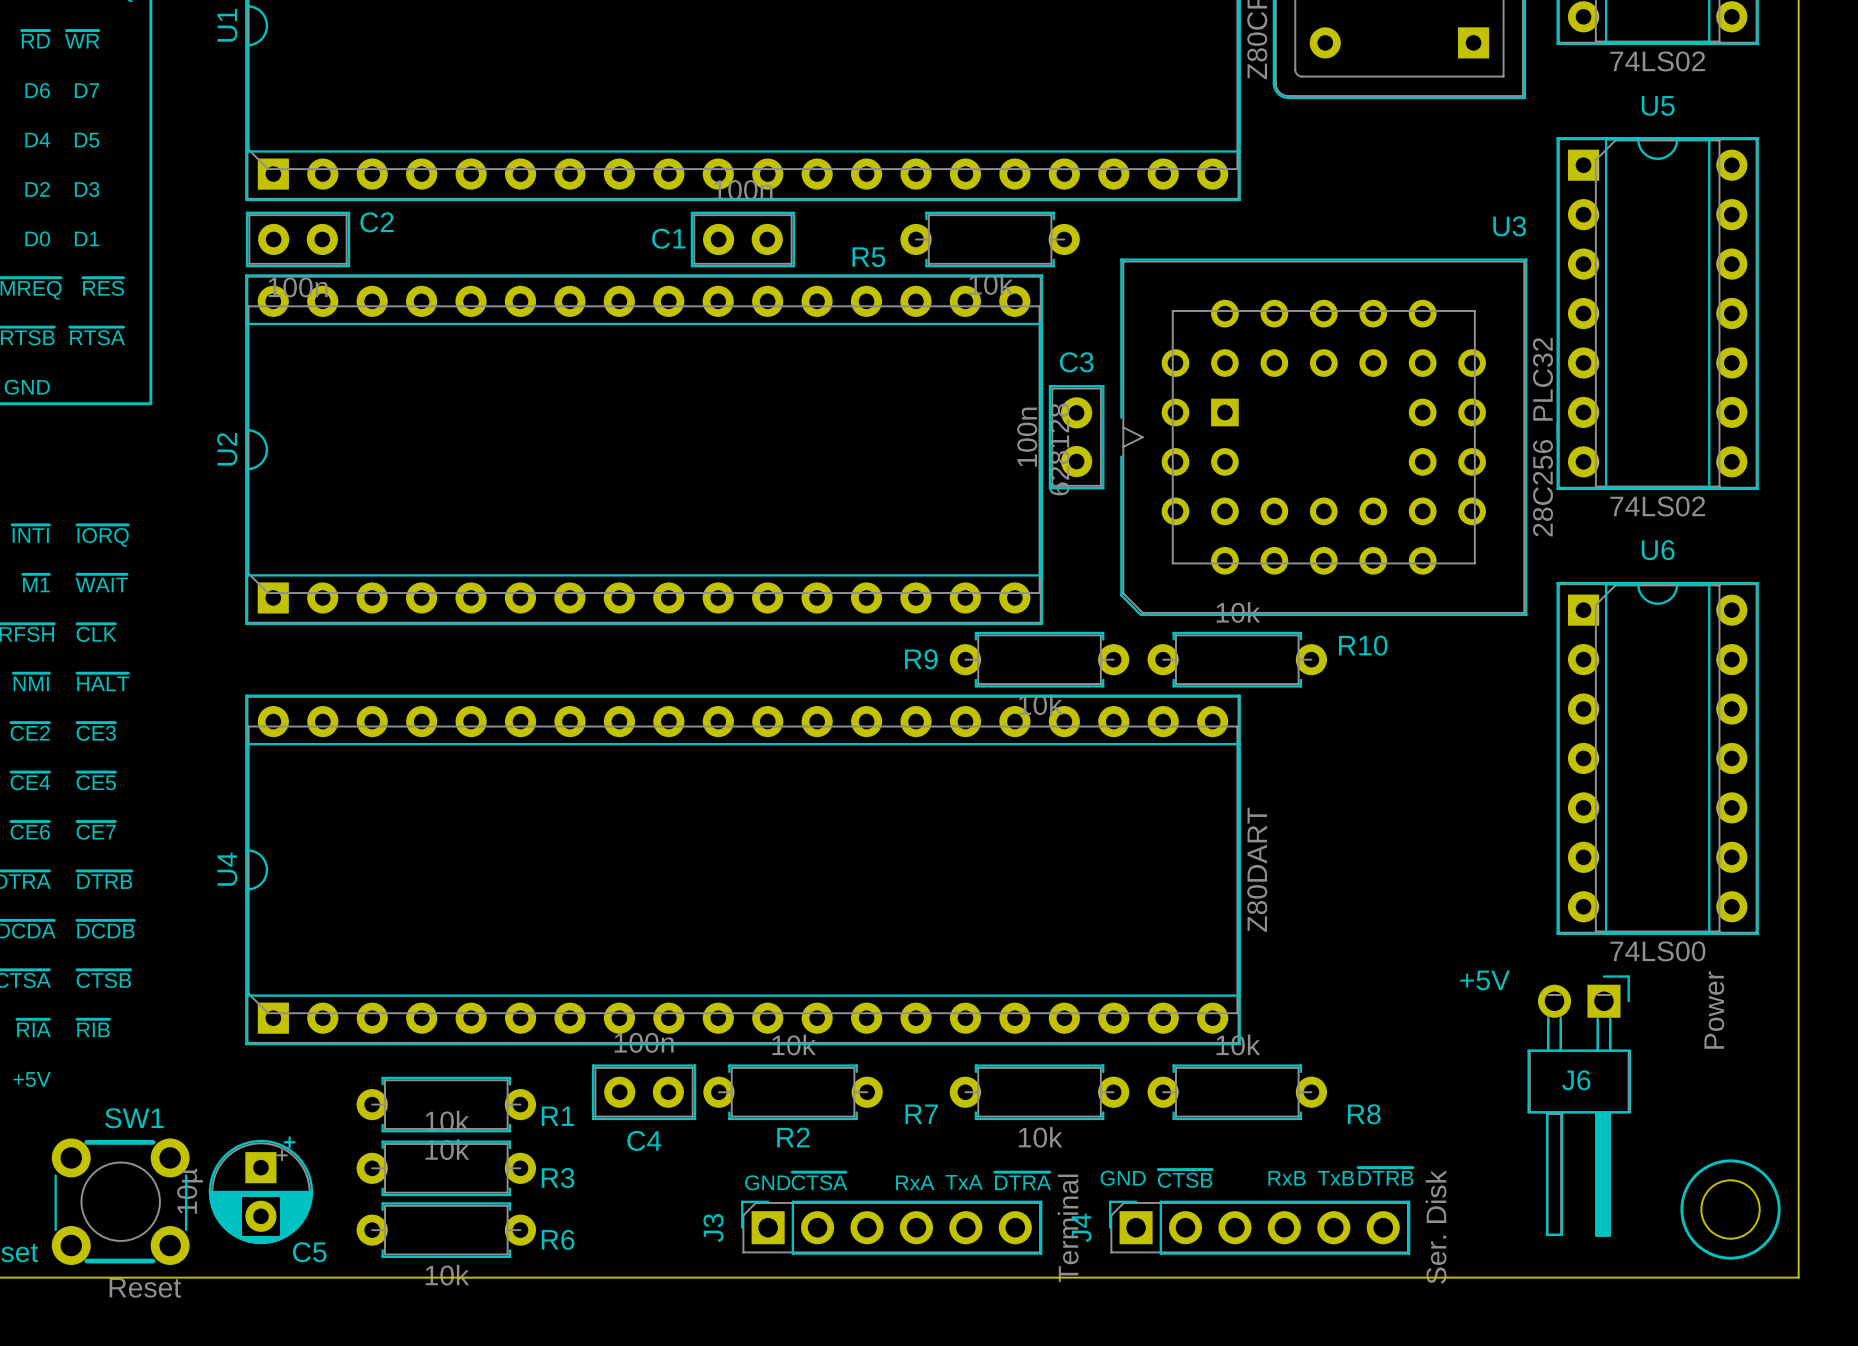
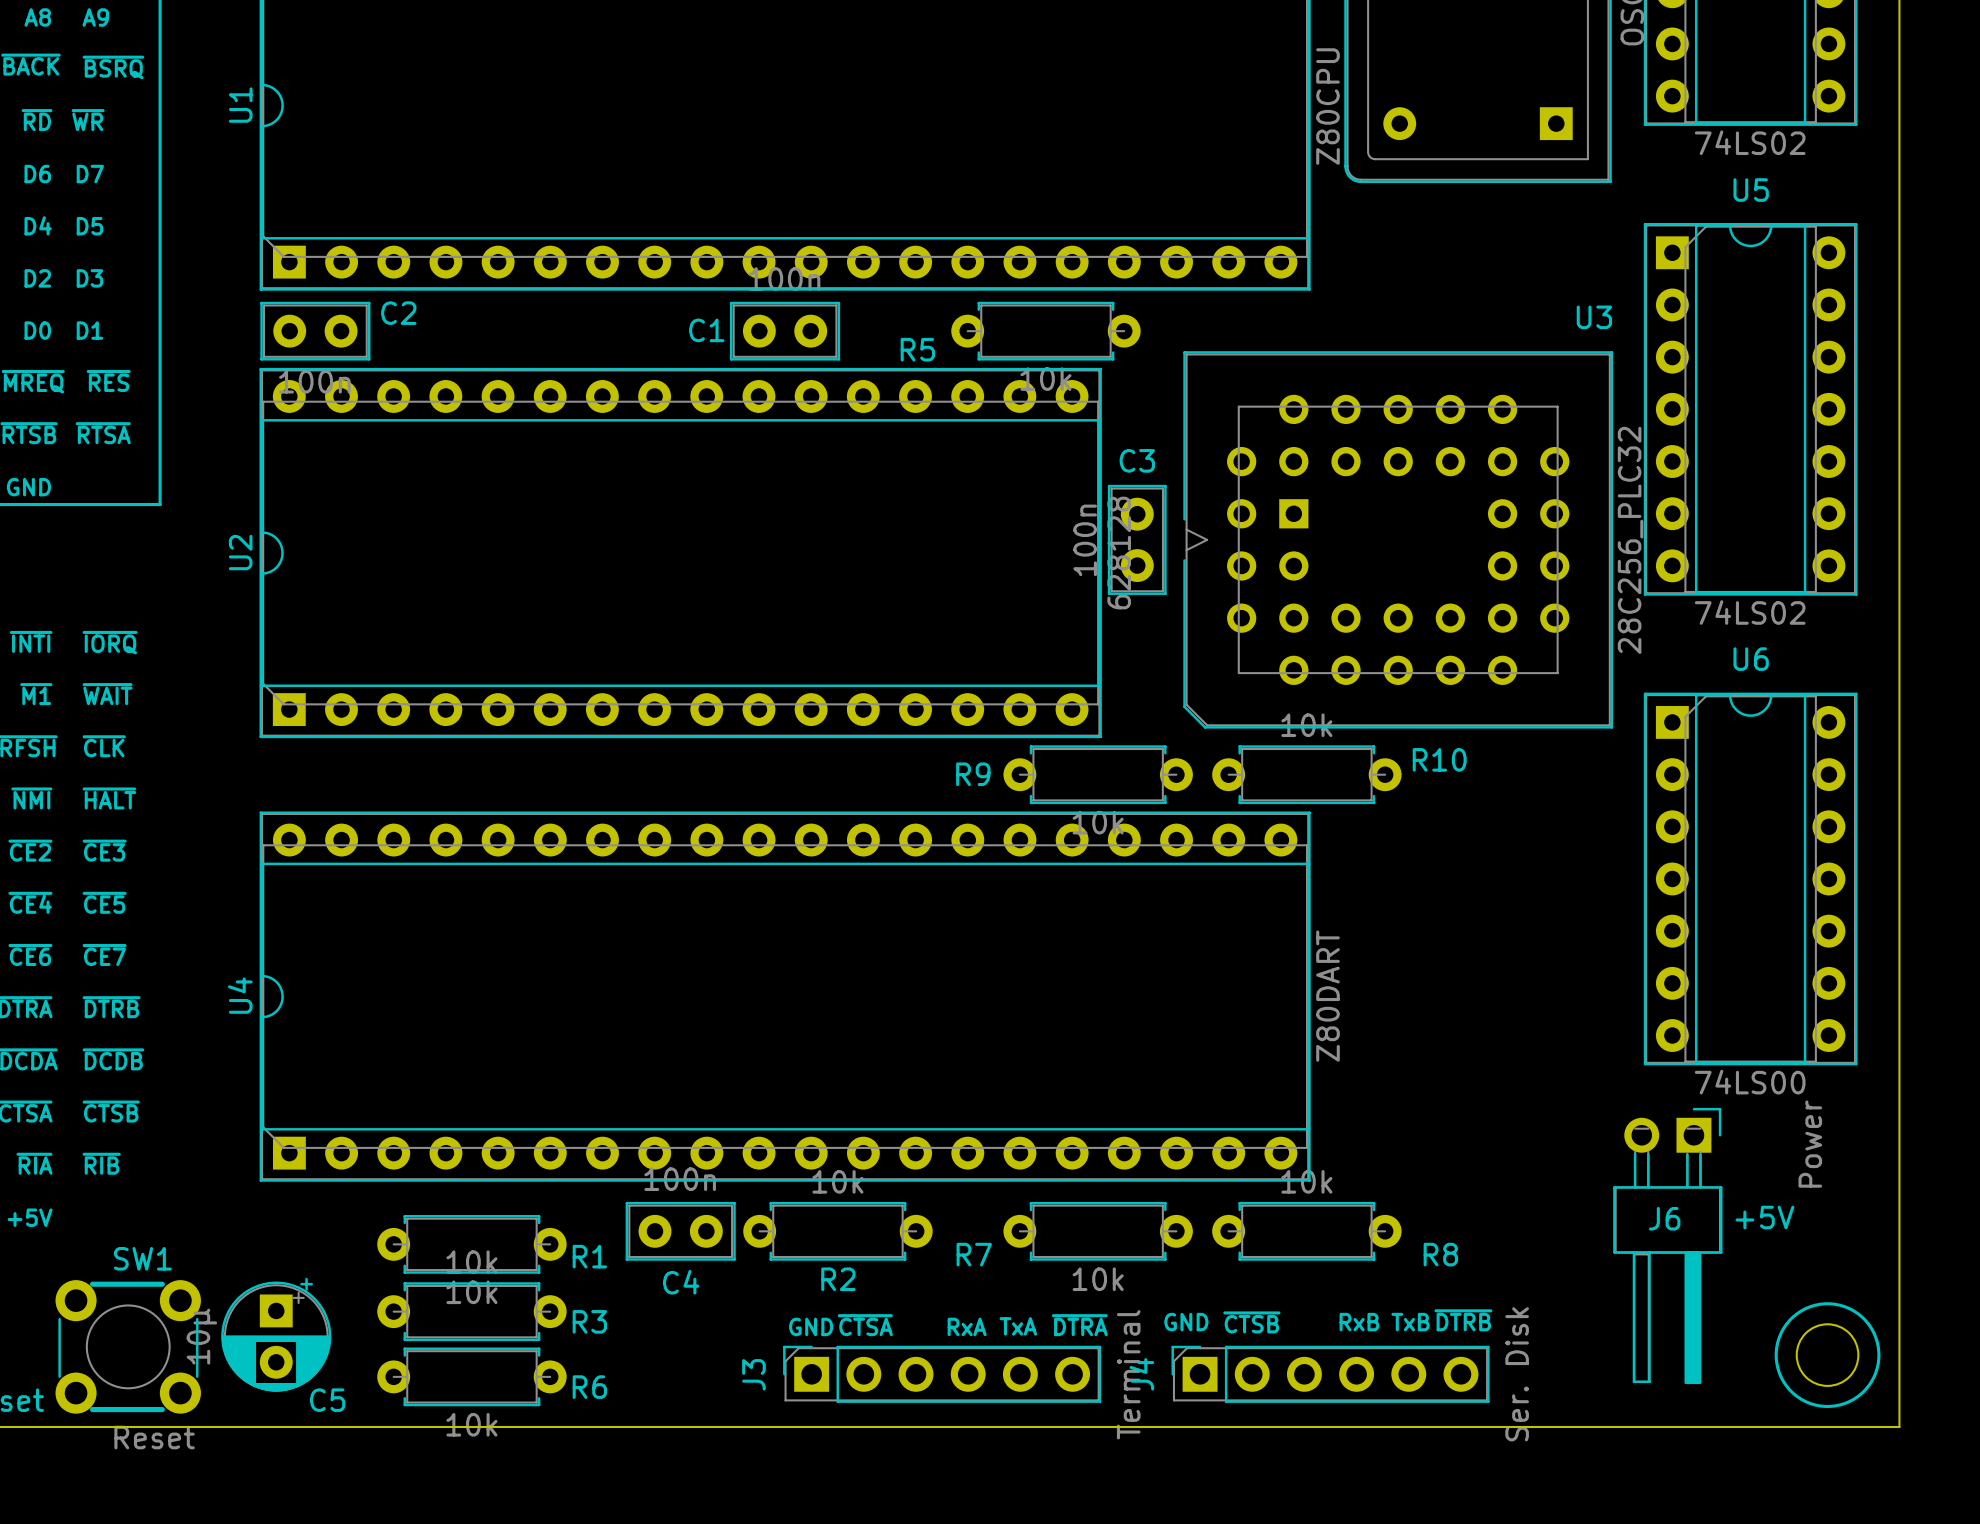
text position: +5V (1485, 980) -> +5V (1764, 1217)

